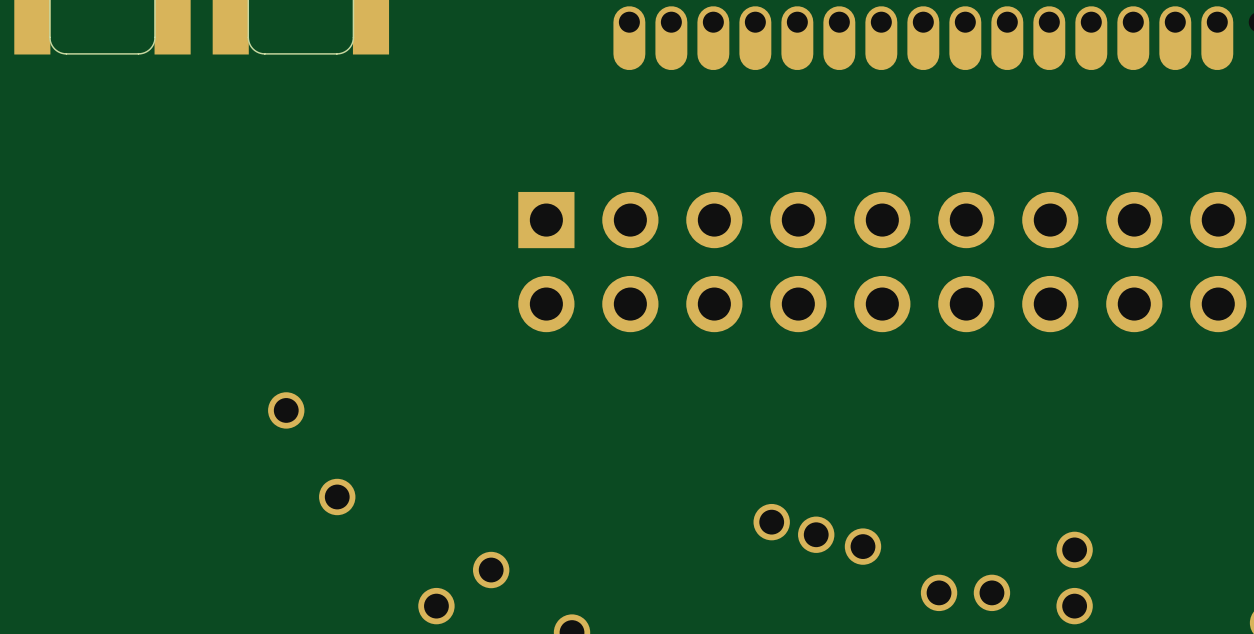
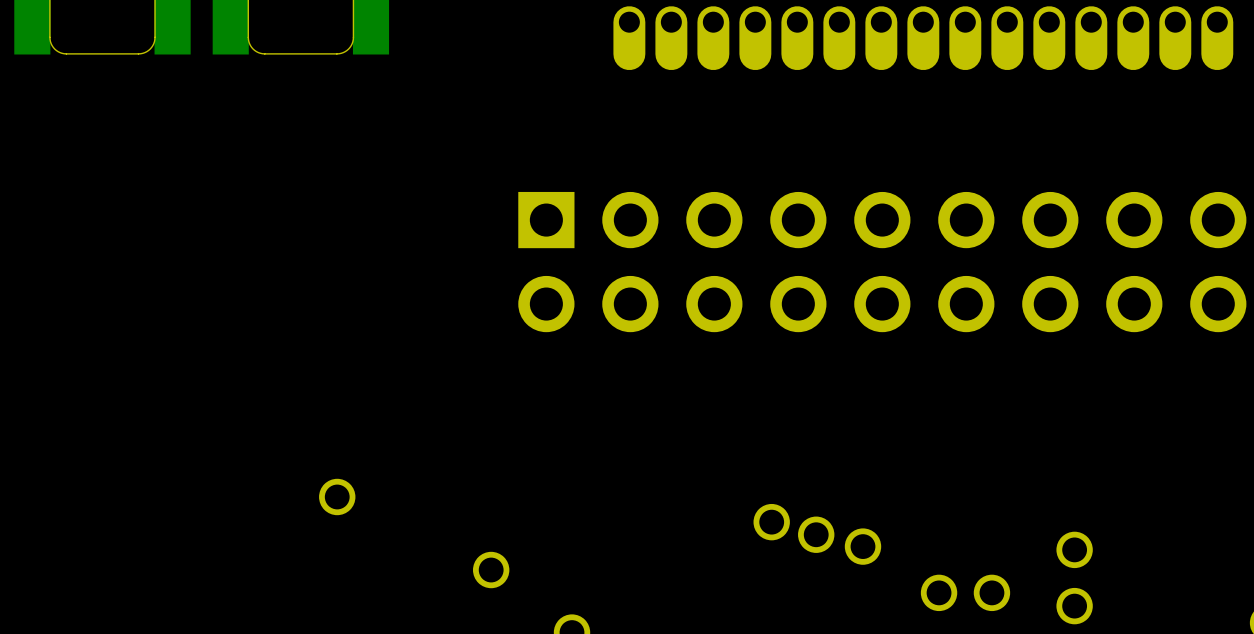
part: (286, 410) -> none
part: (436, 606) -> none

